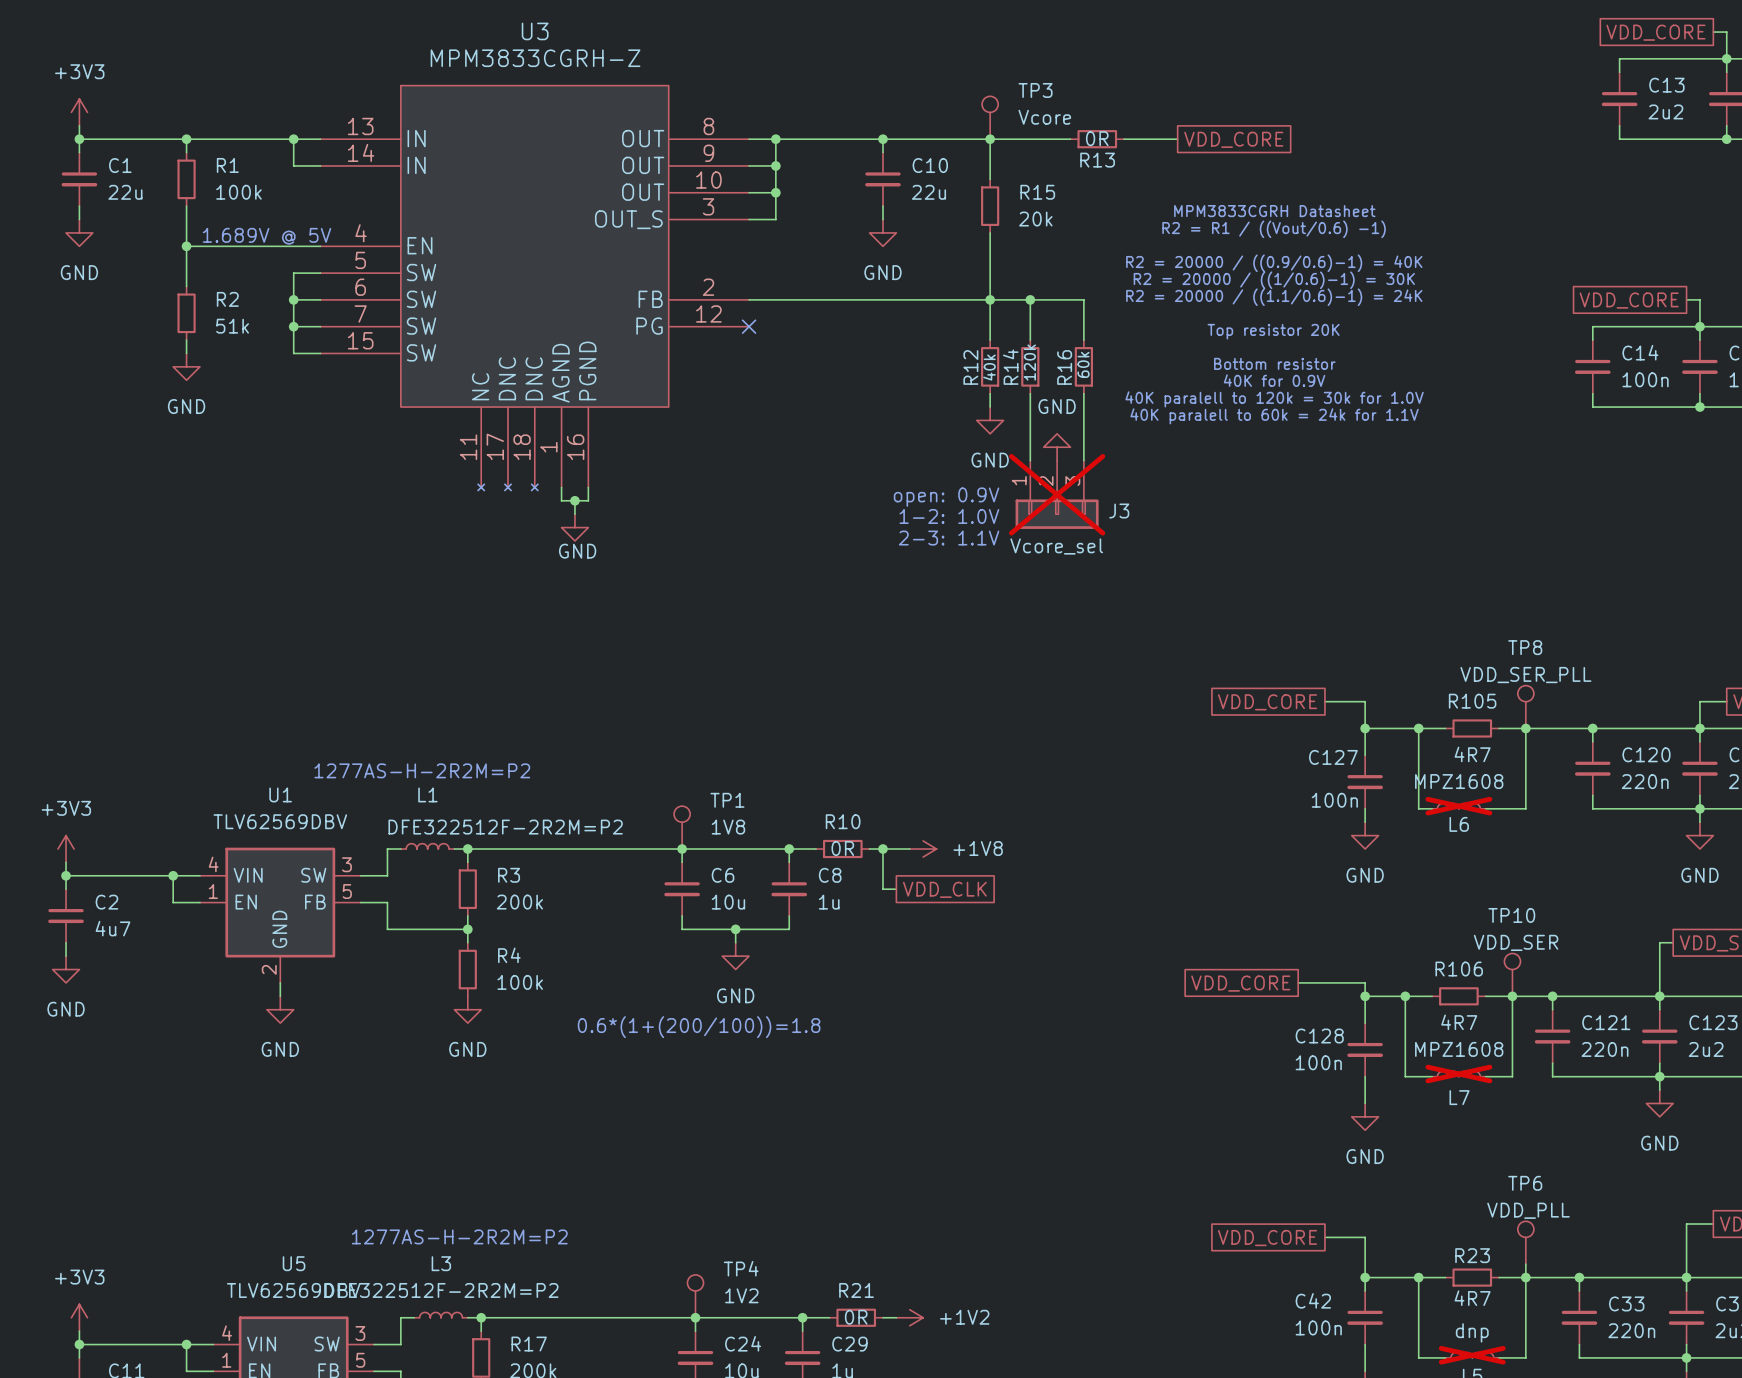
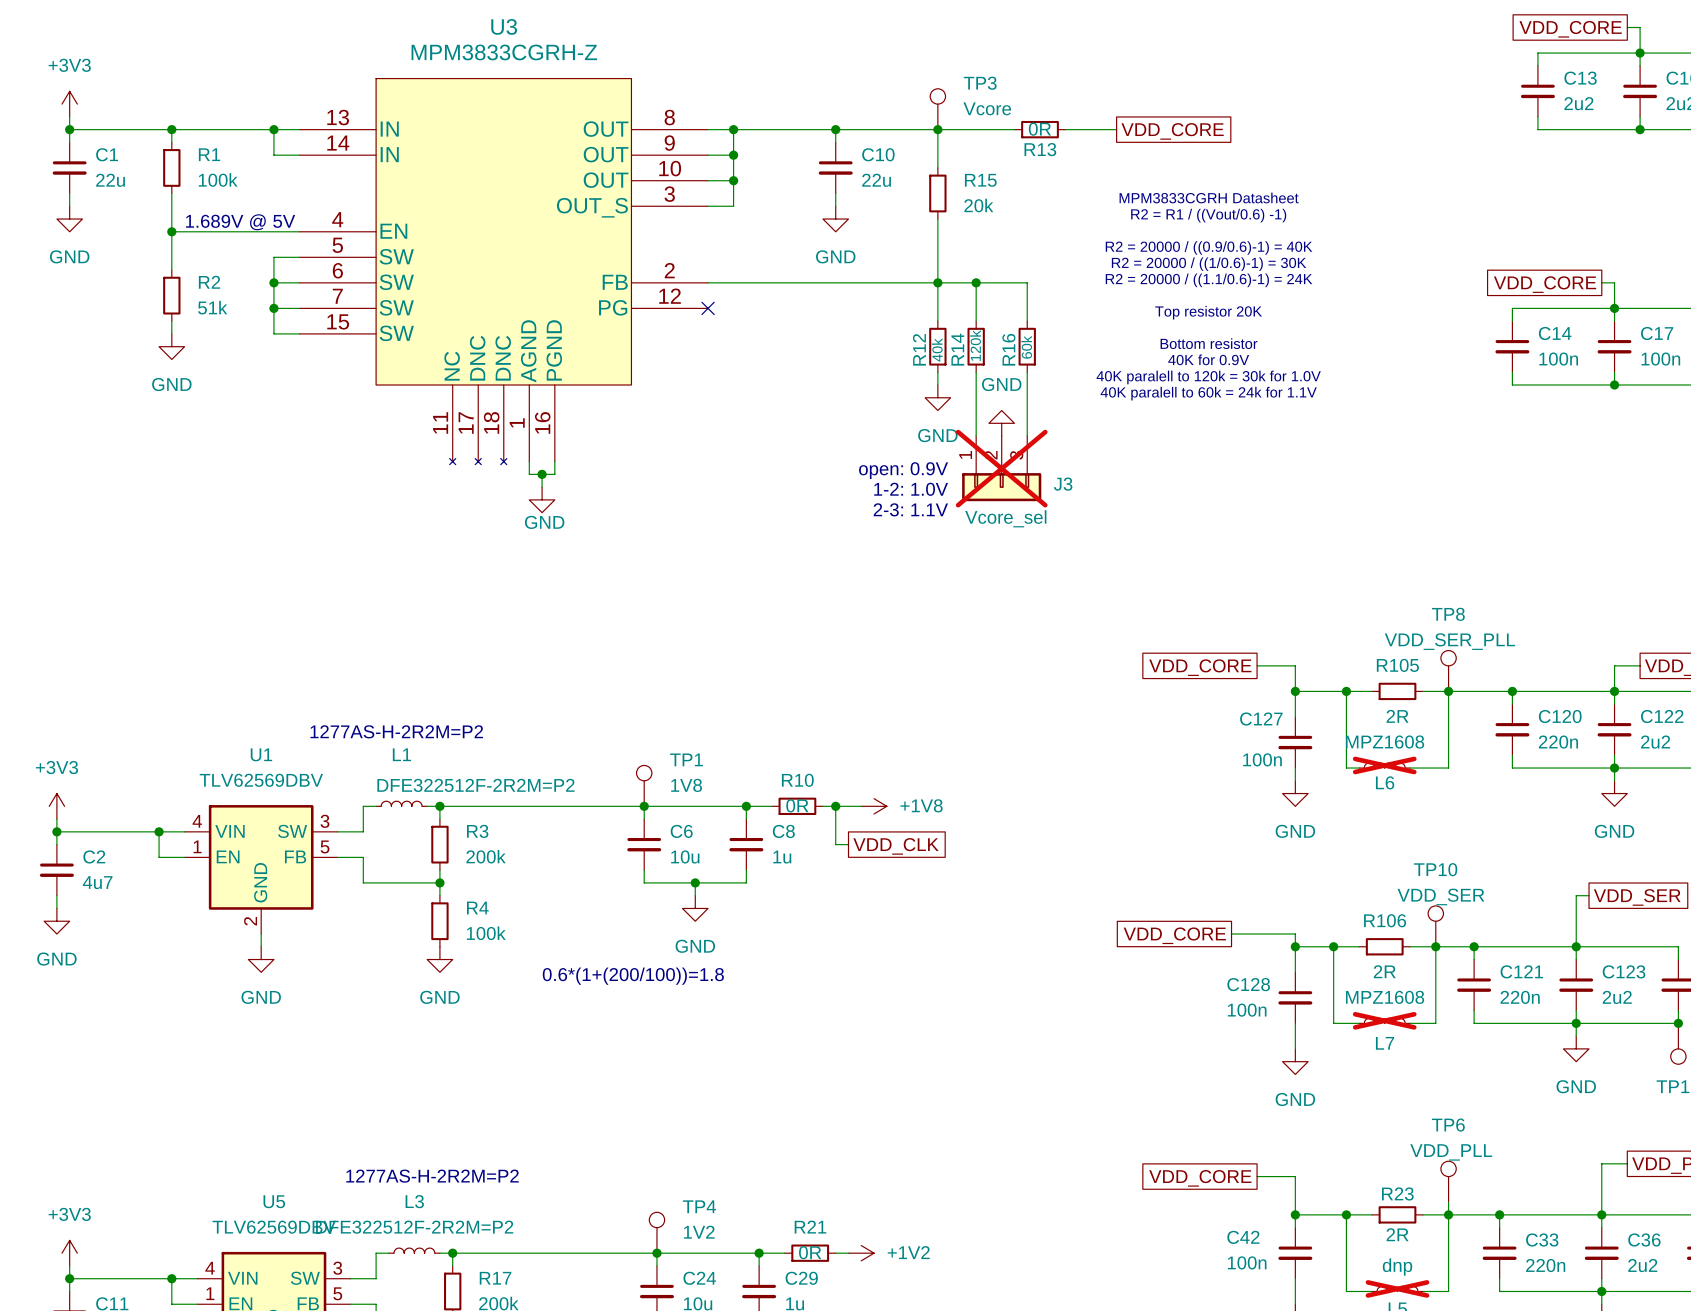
R105 value: 4R7 (1472, 754) -> 2R (1397, 716)
R106 value: 4R7 (1459, 1022) -> 2R (1384, 971)
R23 value: 4R7 (1472, 1298) -> 2R (1397, 1234)

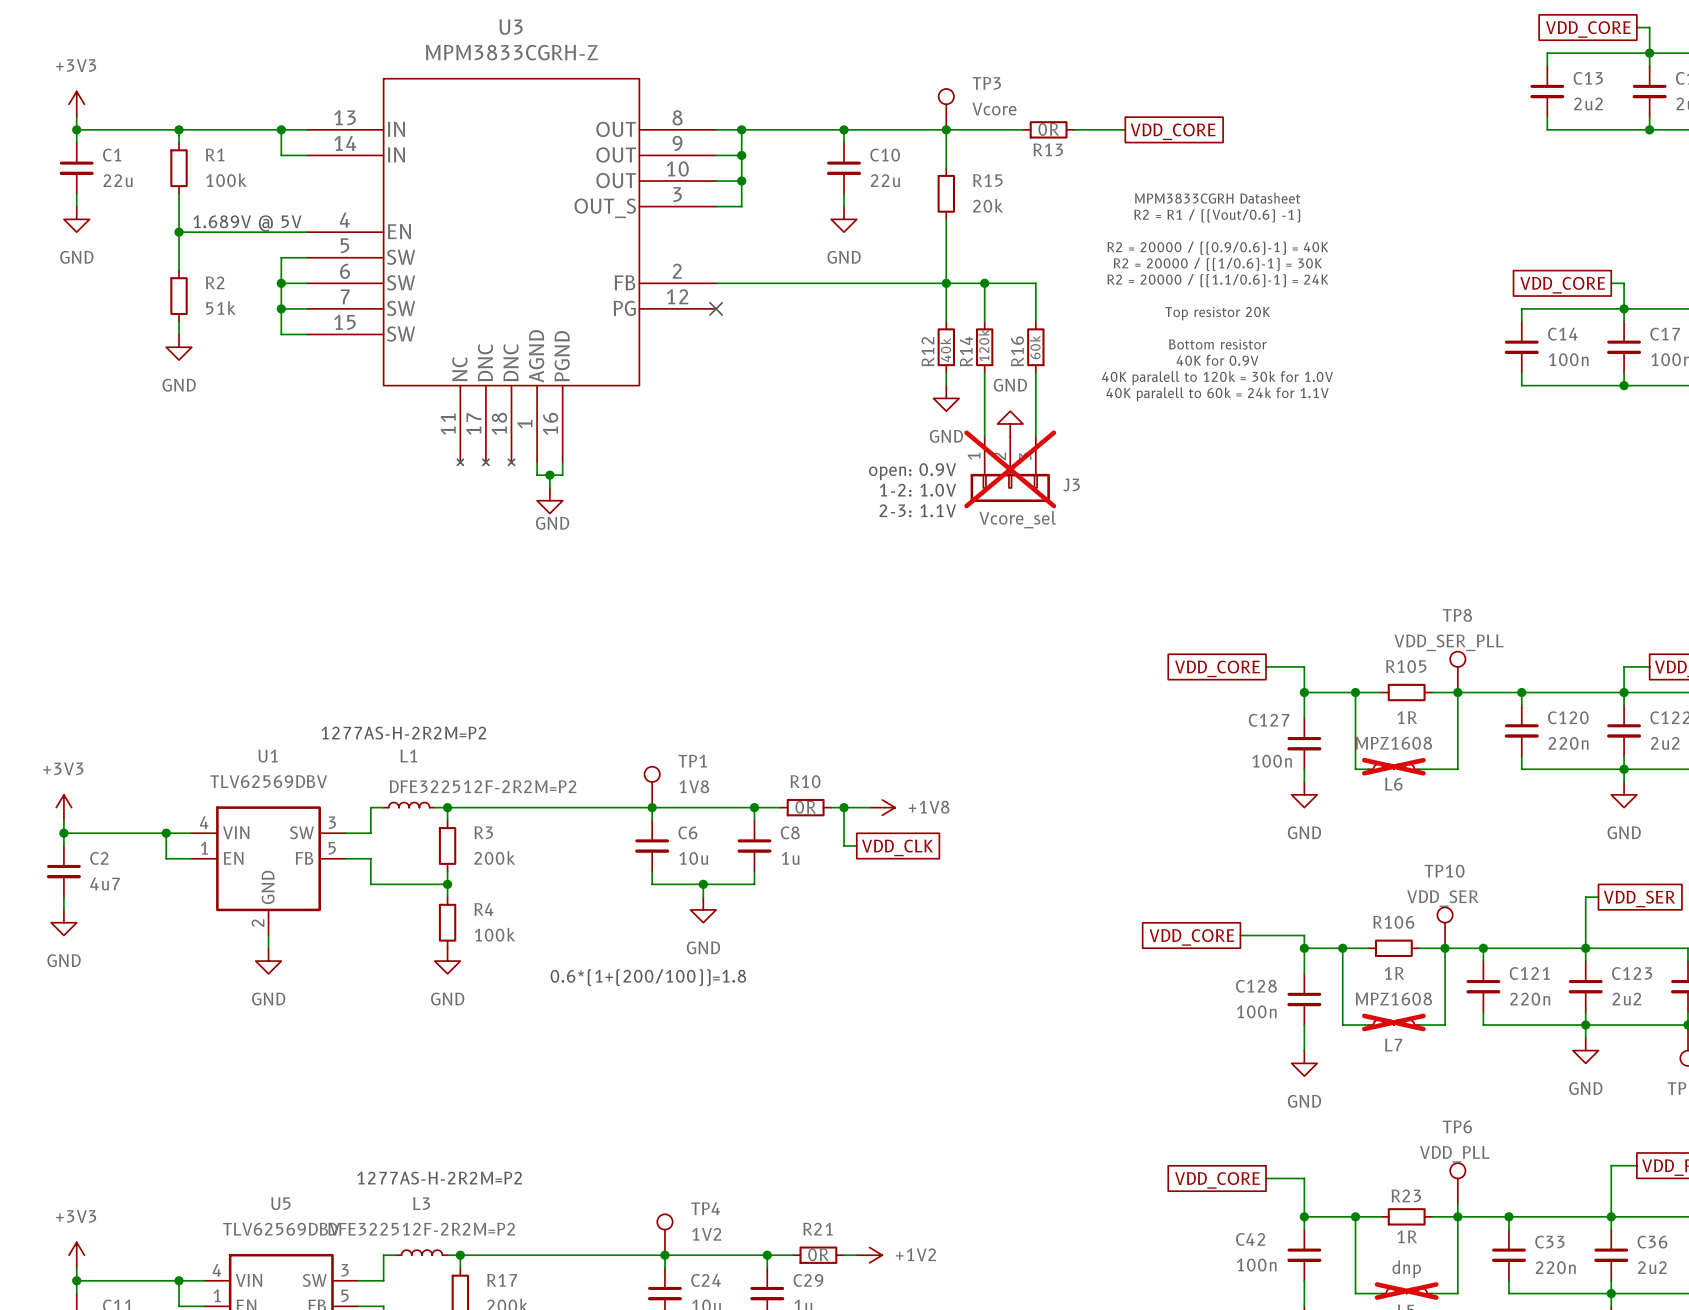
R105 value: 2R (1397, 716) -> 1R (1407, 717)
R106 value: 2R (1384, 971) -> 1R (1394, 973)
R23 value: 2R (1397, 1234) -> 1R (1407, 1236)

